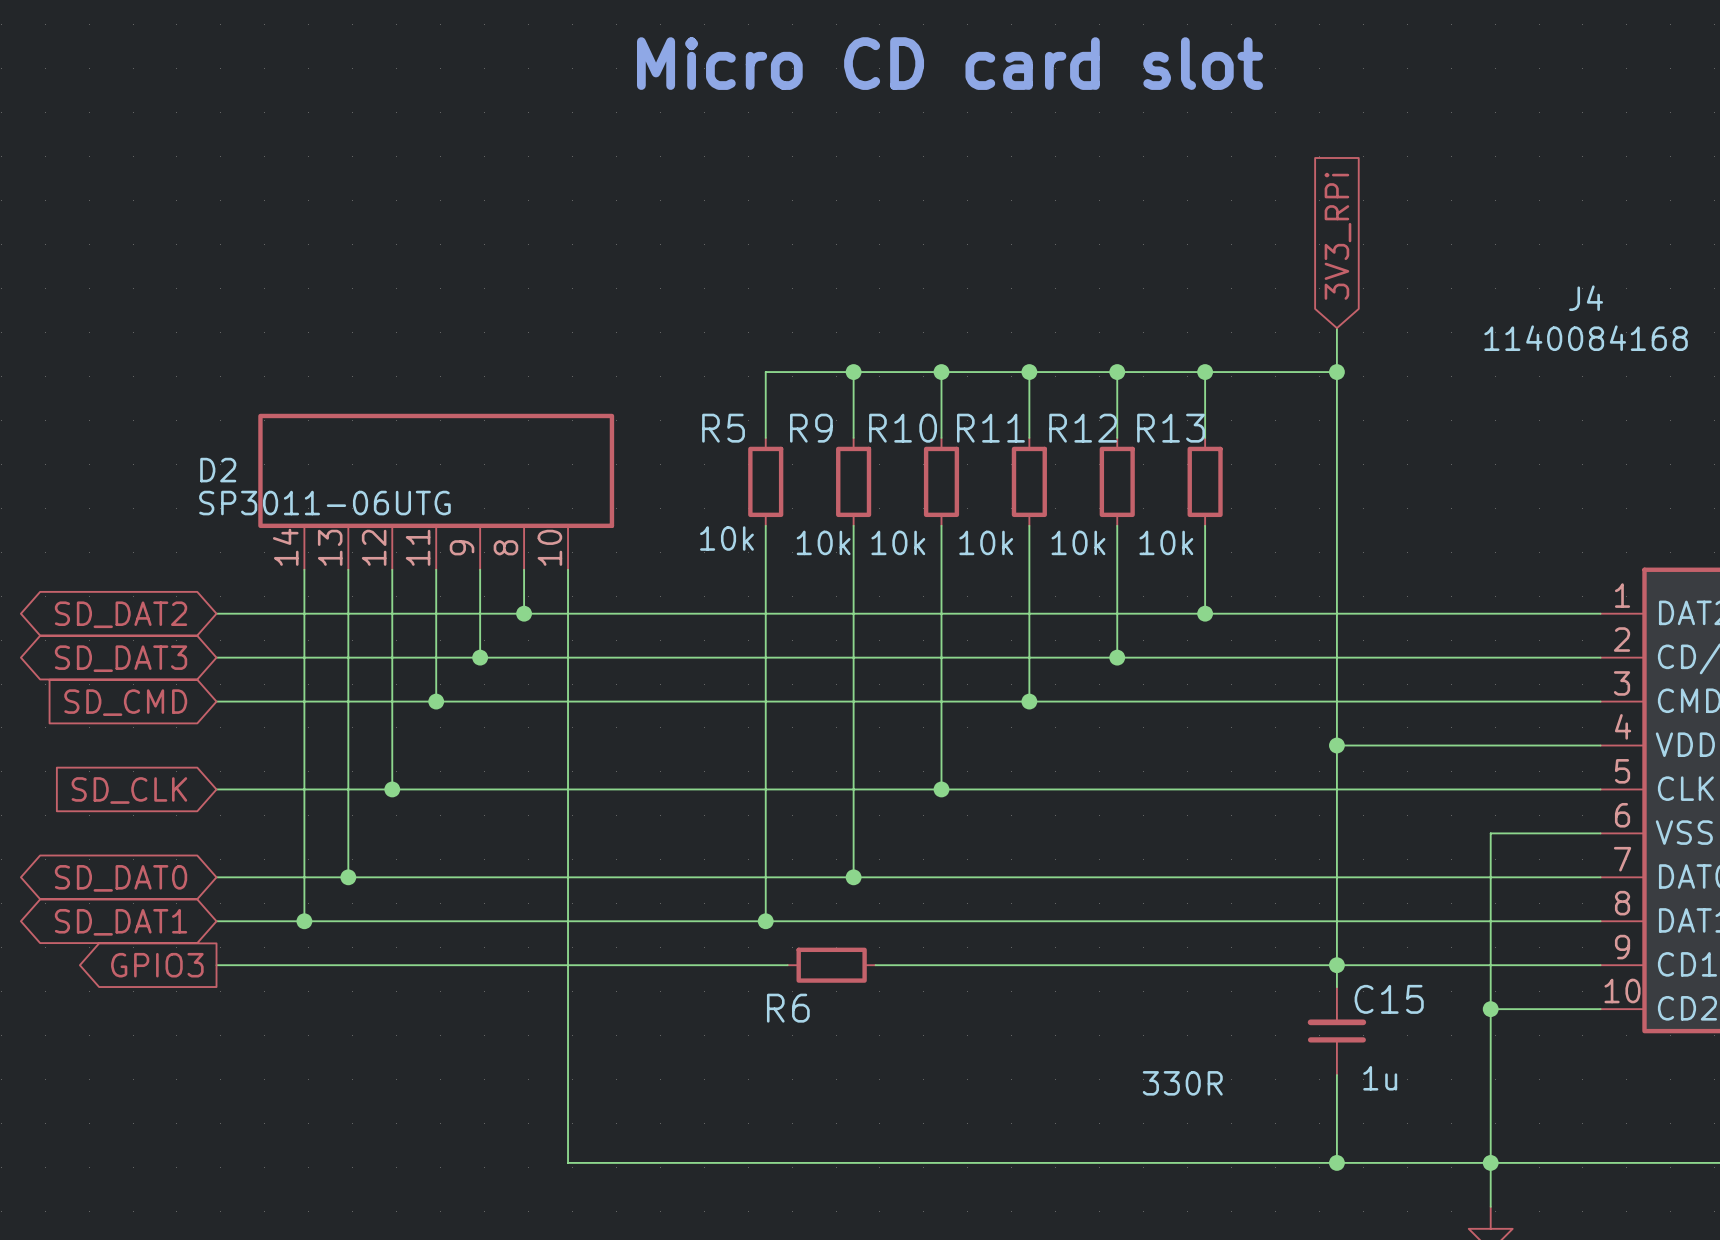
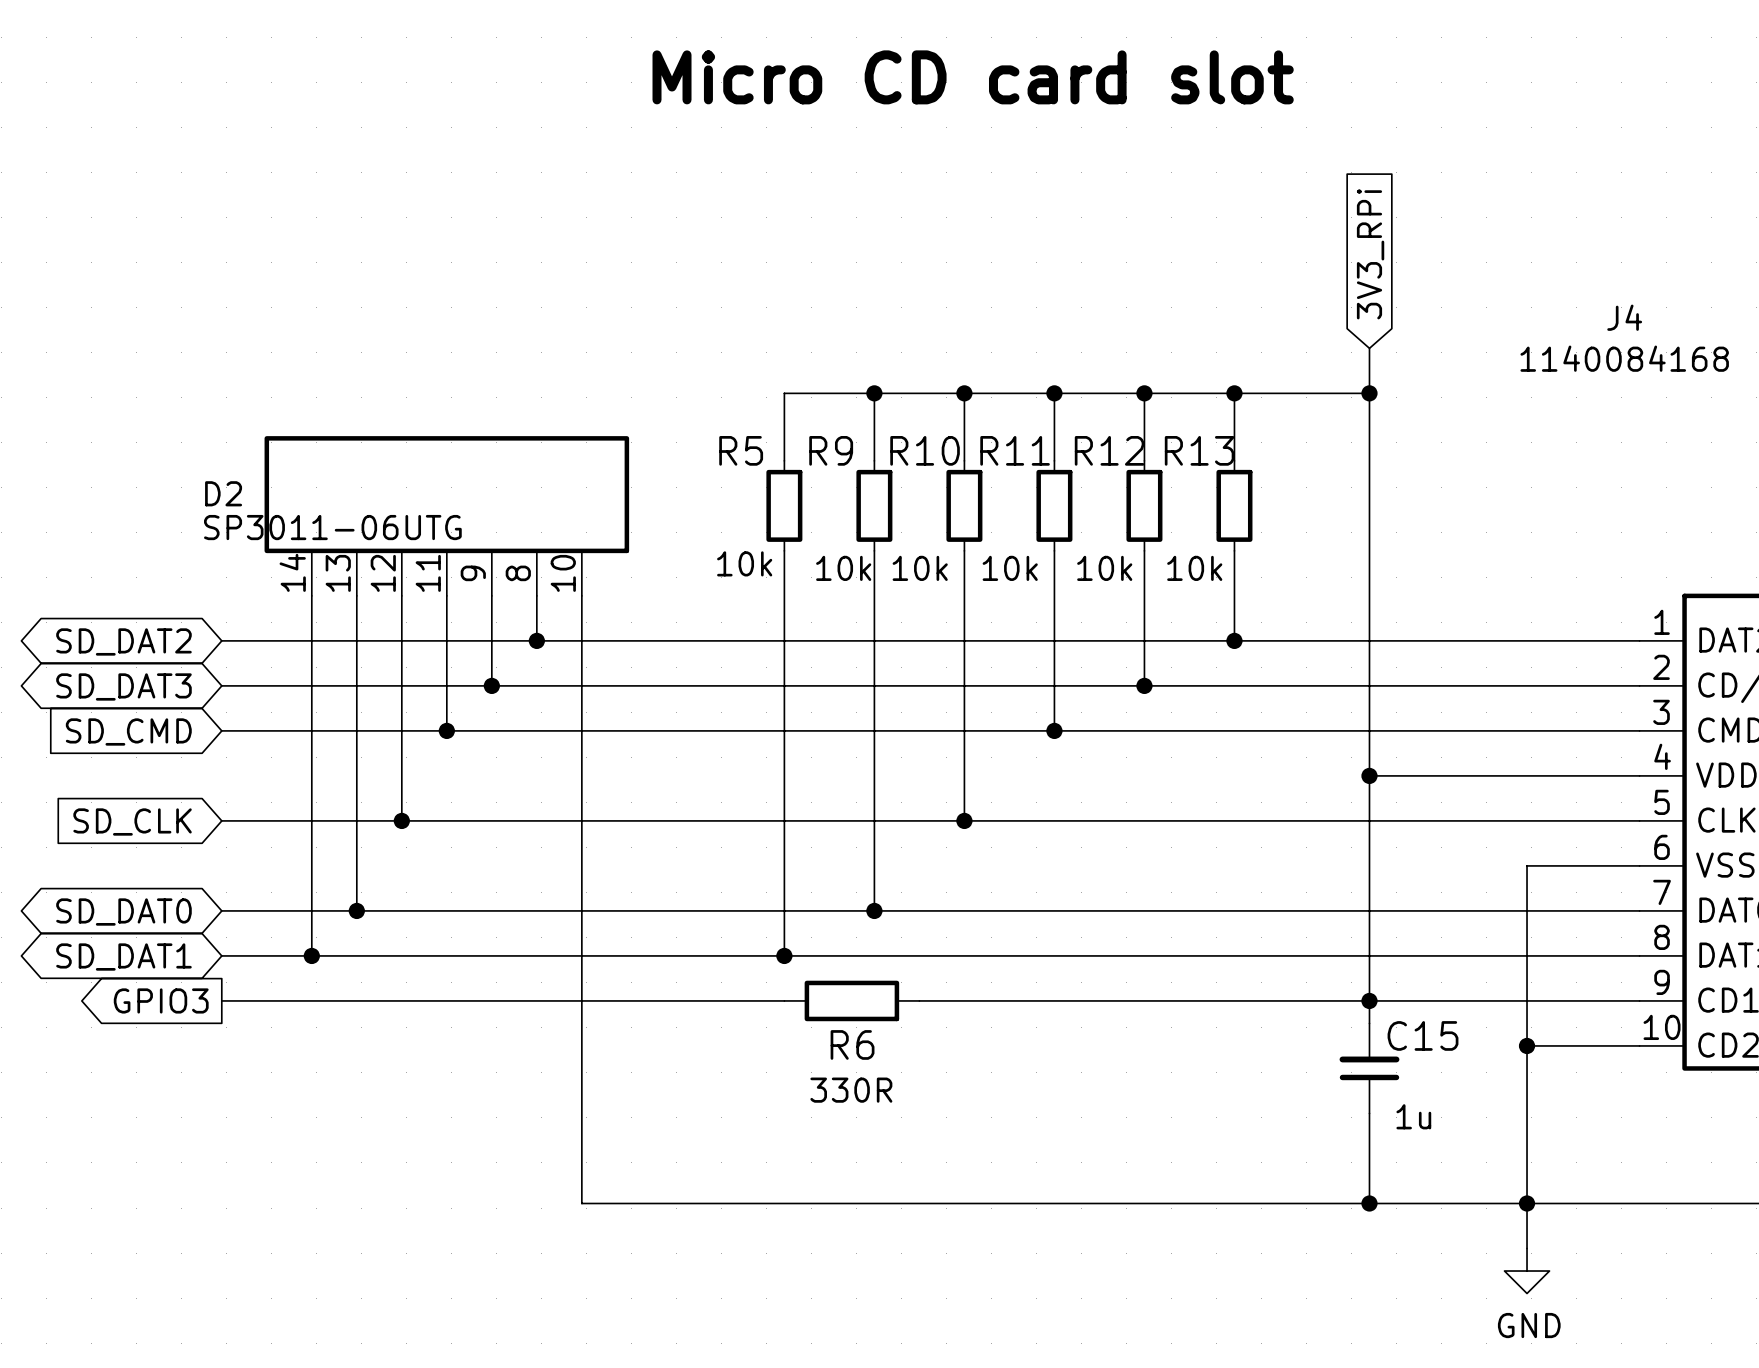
R6 symbol: [787, 947, 876, 983] -> [784, 980, 920, 1022]
R6 name position: R6 (788, 1008) -> R6 (852, 1044)
R6 text position: 330R (1182, 1083) -> 330R (851, 1090)

